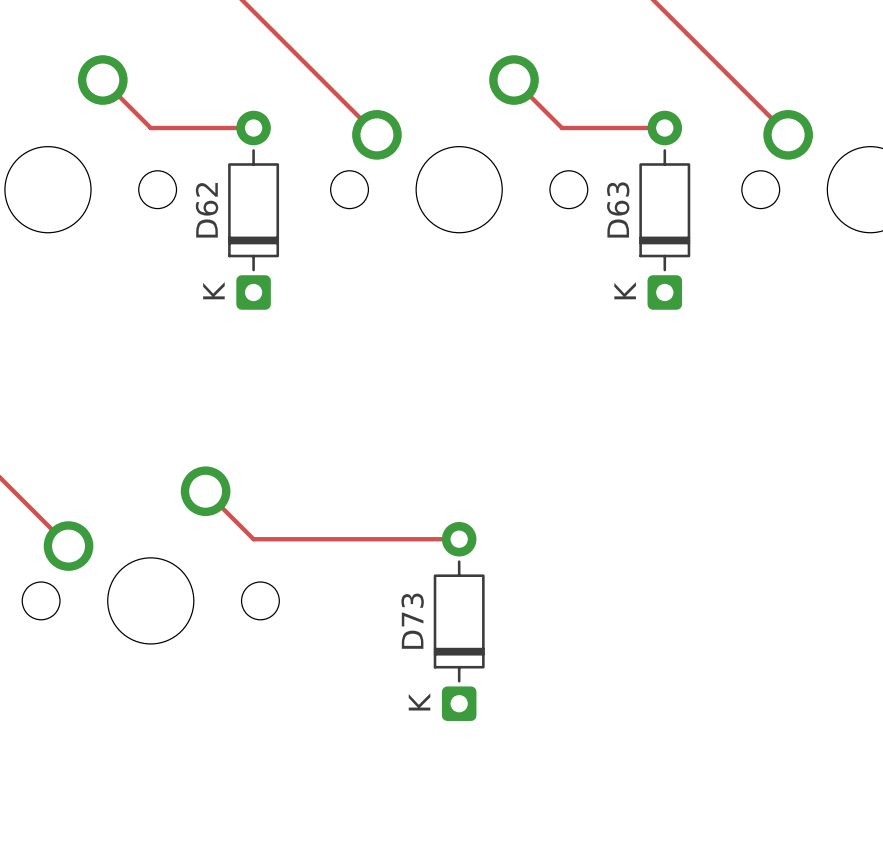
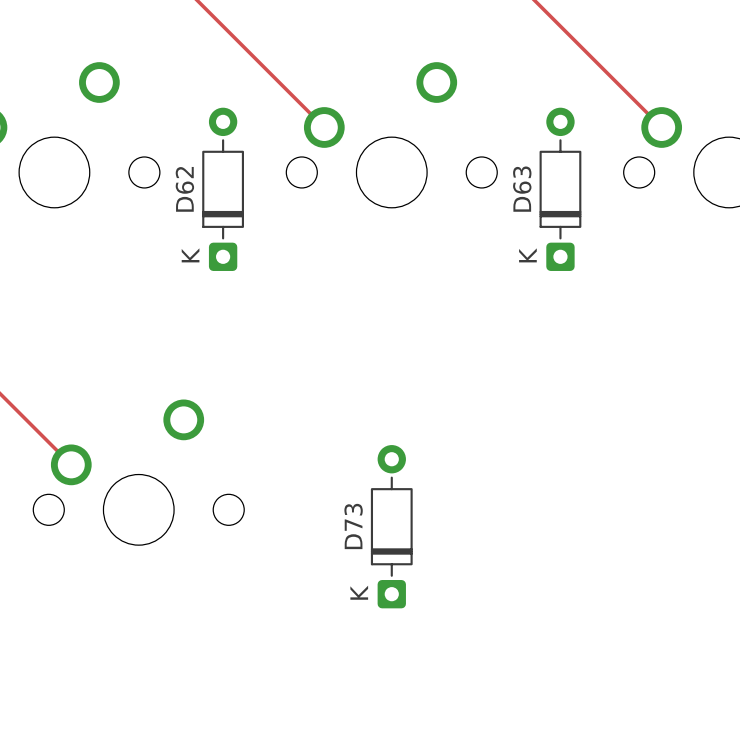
track: (102, 80) (150, 128) (253, 128) -> none
track: (514, 80) (561, 128) (664, 128) -> none
track: (205, 491) (253, 539) (459, 539) -> none

